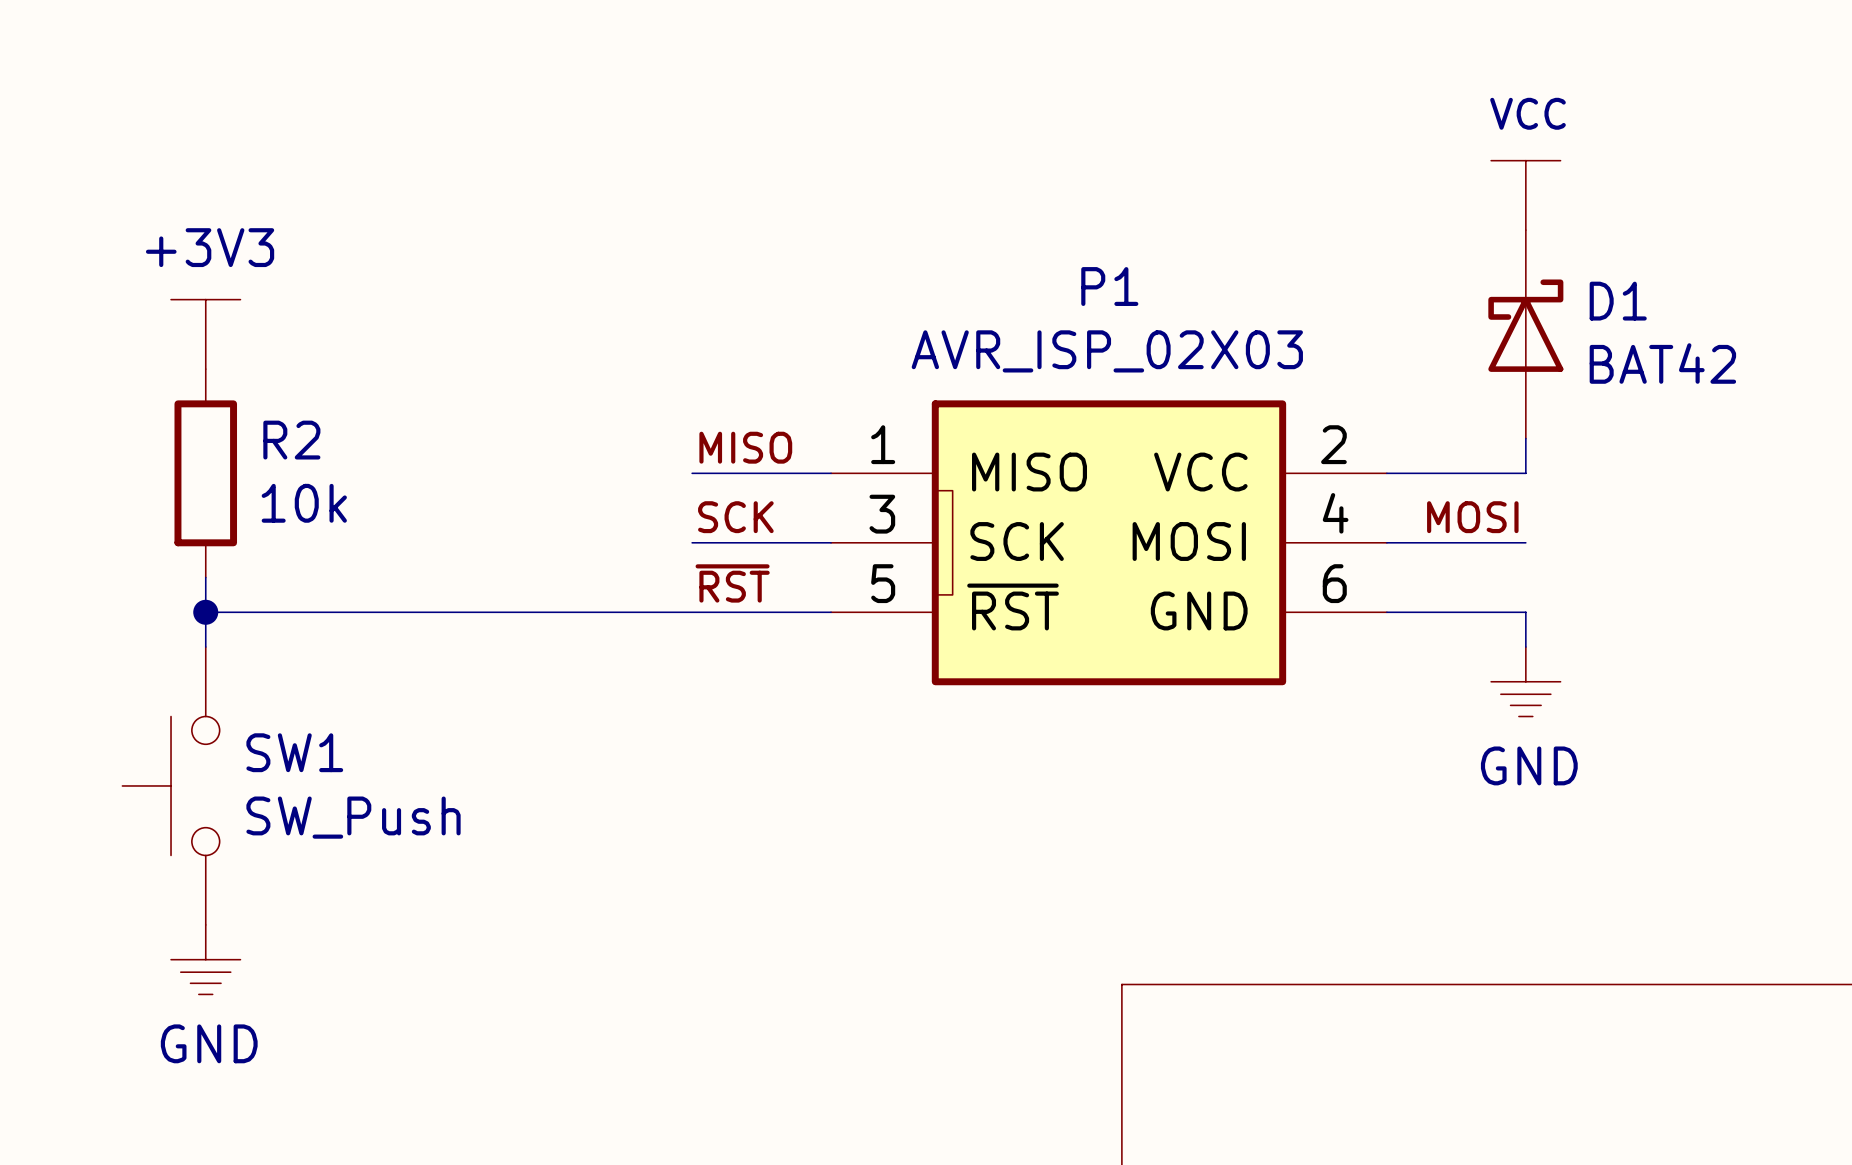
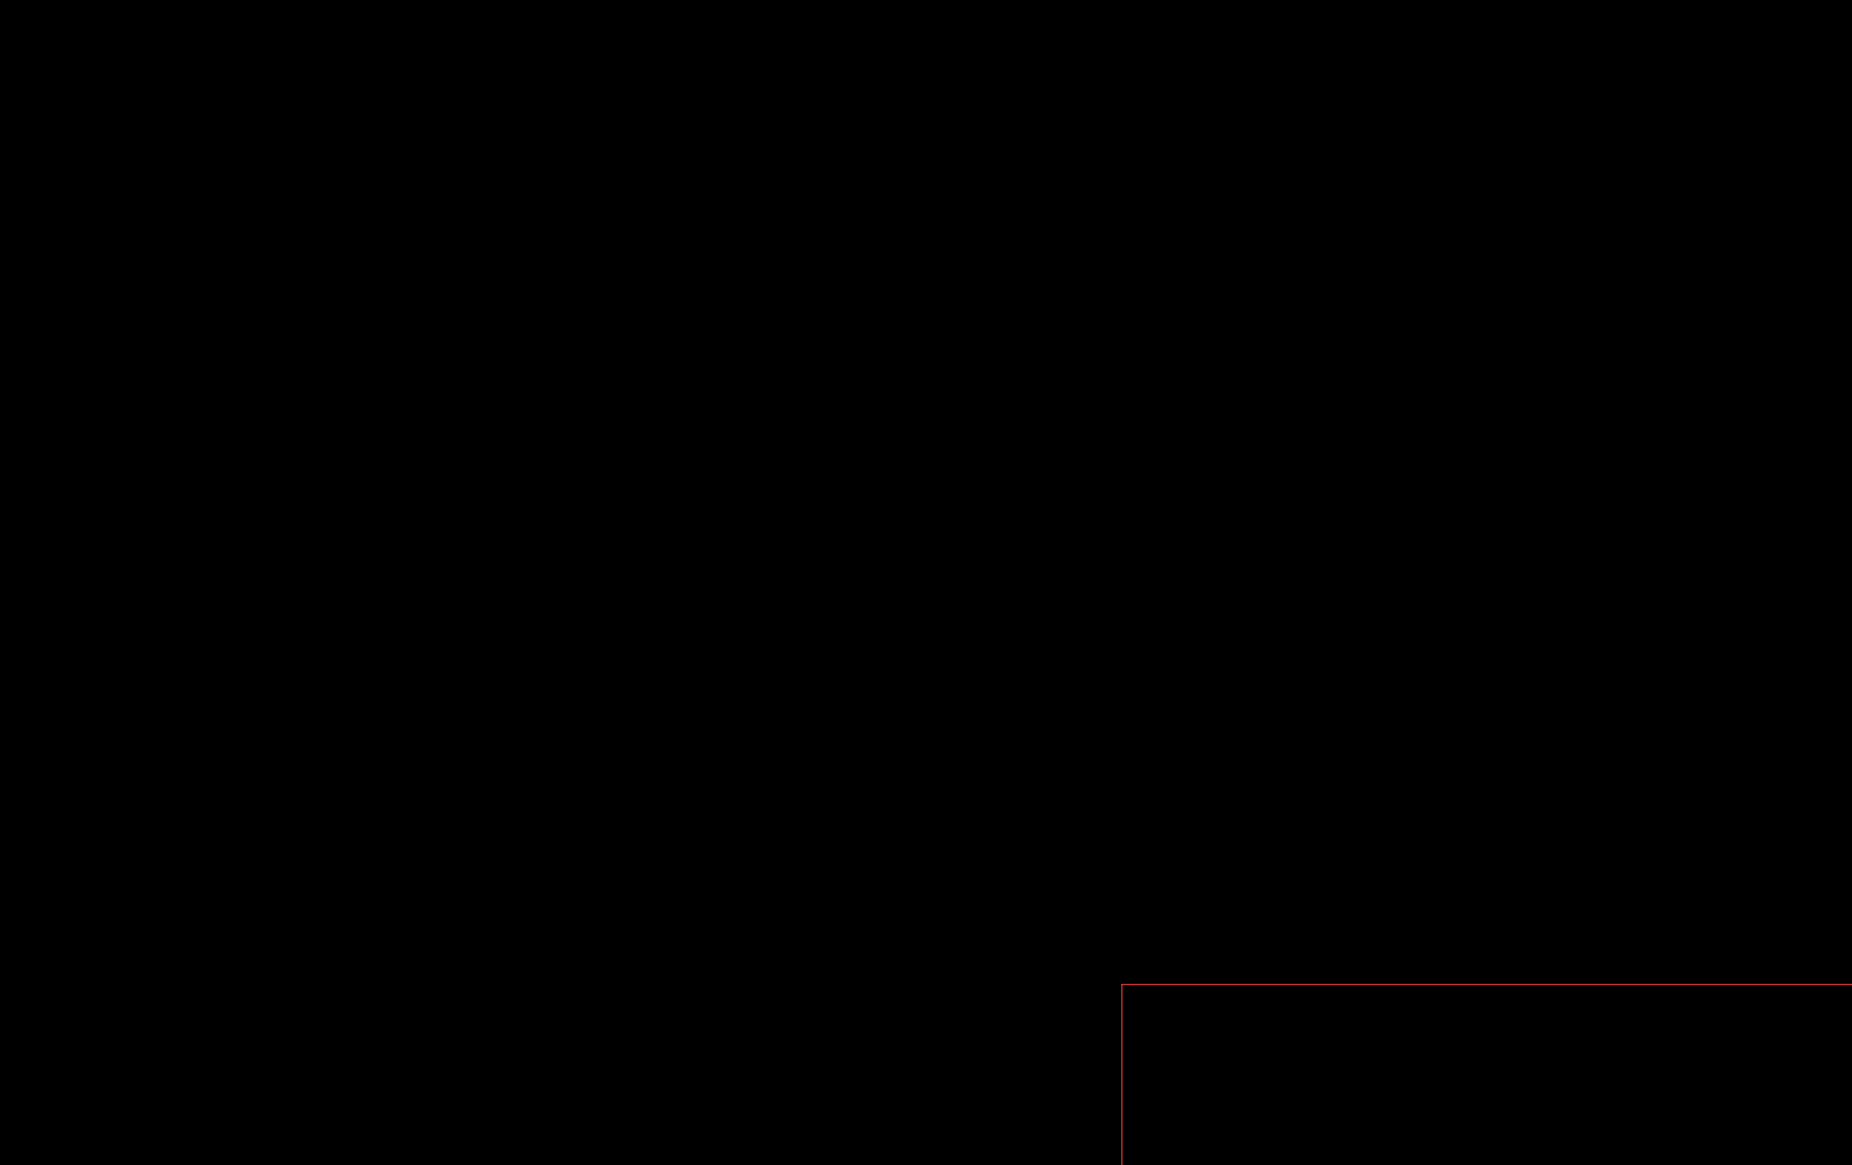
power symbol: VCC (1525, 195) -> none
power symbol: +3V3 (205, 334) -> none
D1: BAT42 (1525, 334) -> none
wire: (1525, 438) (1525, 473) (1386, 473) -> none
label: MISO (745, 447) -> none
R2: 10k (205, 473) -> none
wire: (692, 473) (831, 473) -> none
label: SCK (735, 517) -> none
label: MOSI (1472, 517) -> none
wire: (692, 542) (831, 542) -> none
P1: AVR_ISP_02X03 (1108, 542) -> none
wire: (1386, 542) (1525, 542) -> none
wire: (205, 577) (205, 647) -> none
label: ~{RST} (732, 583) -> none
wire: (205, 612) (831, 612) -> none
junction: (205, 612) -> none
wire: (1386, 612) (1525, 612) (1525, 647) -> none
power symbol: GND (1525, 681) -> none
SW1: SW_Push (171, 785) -> none
power symbol: GND (205, 959) -> none

